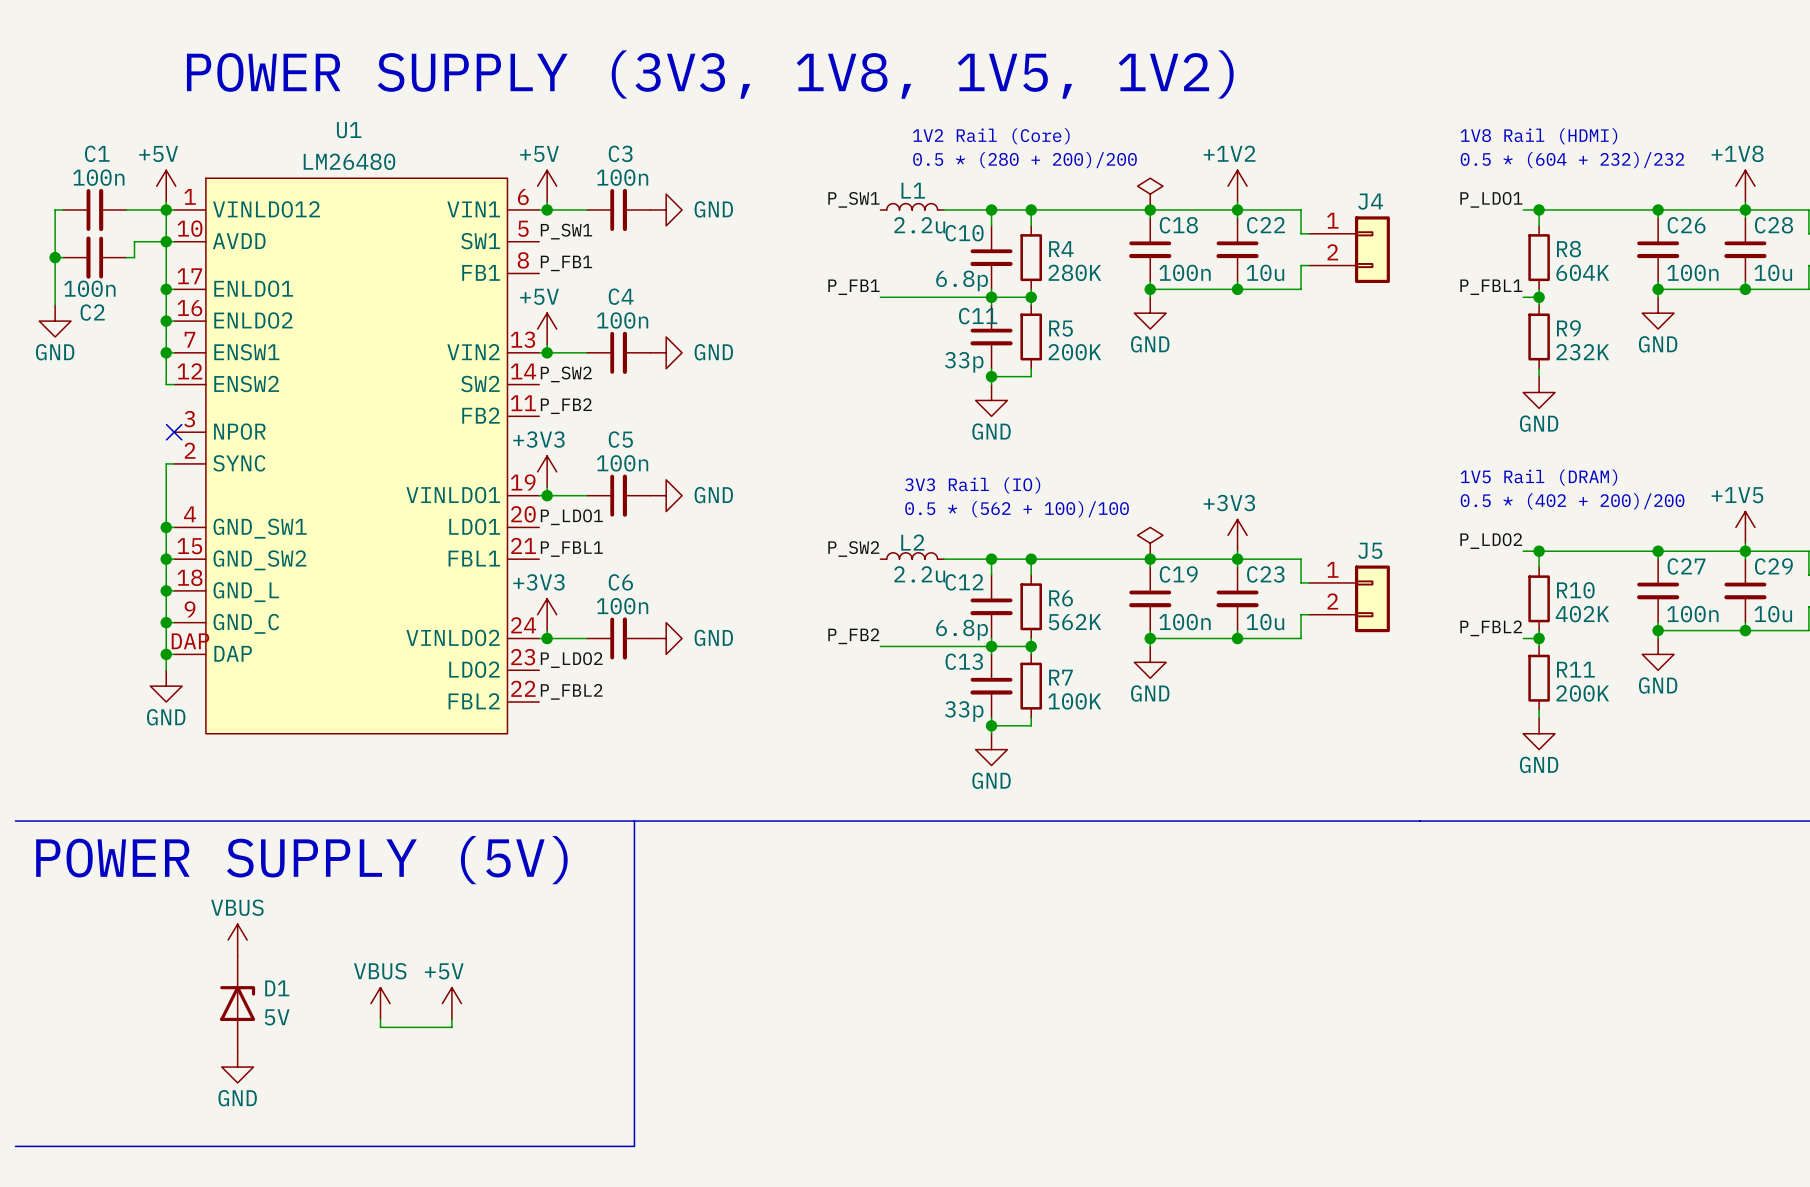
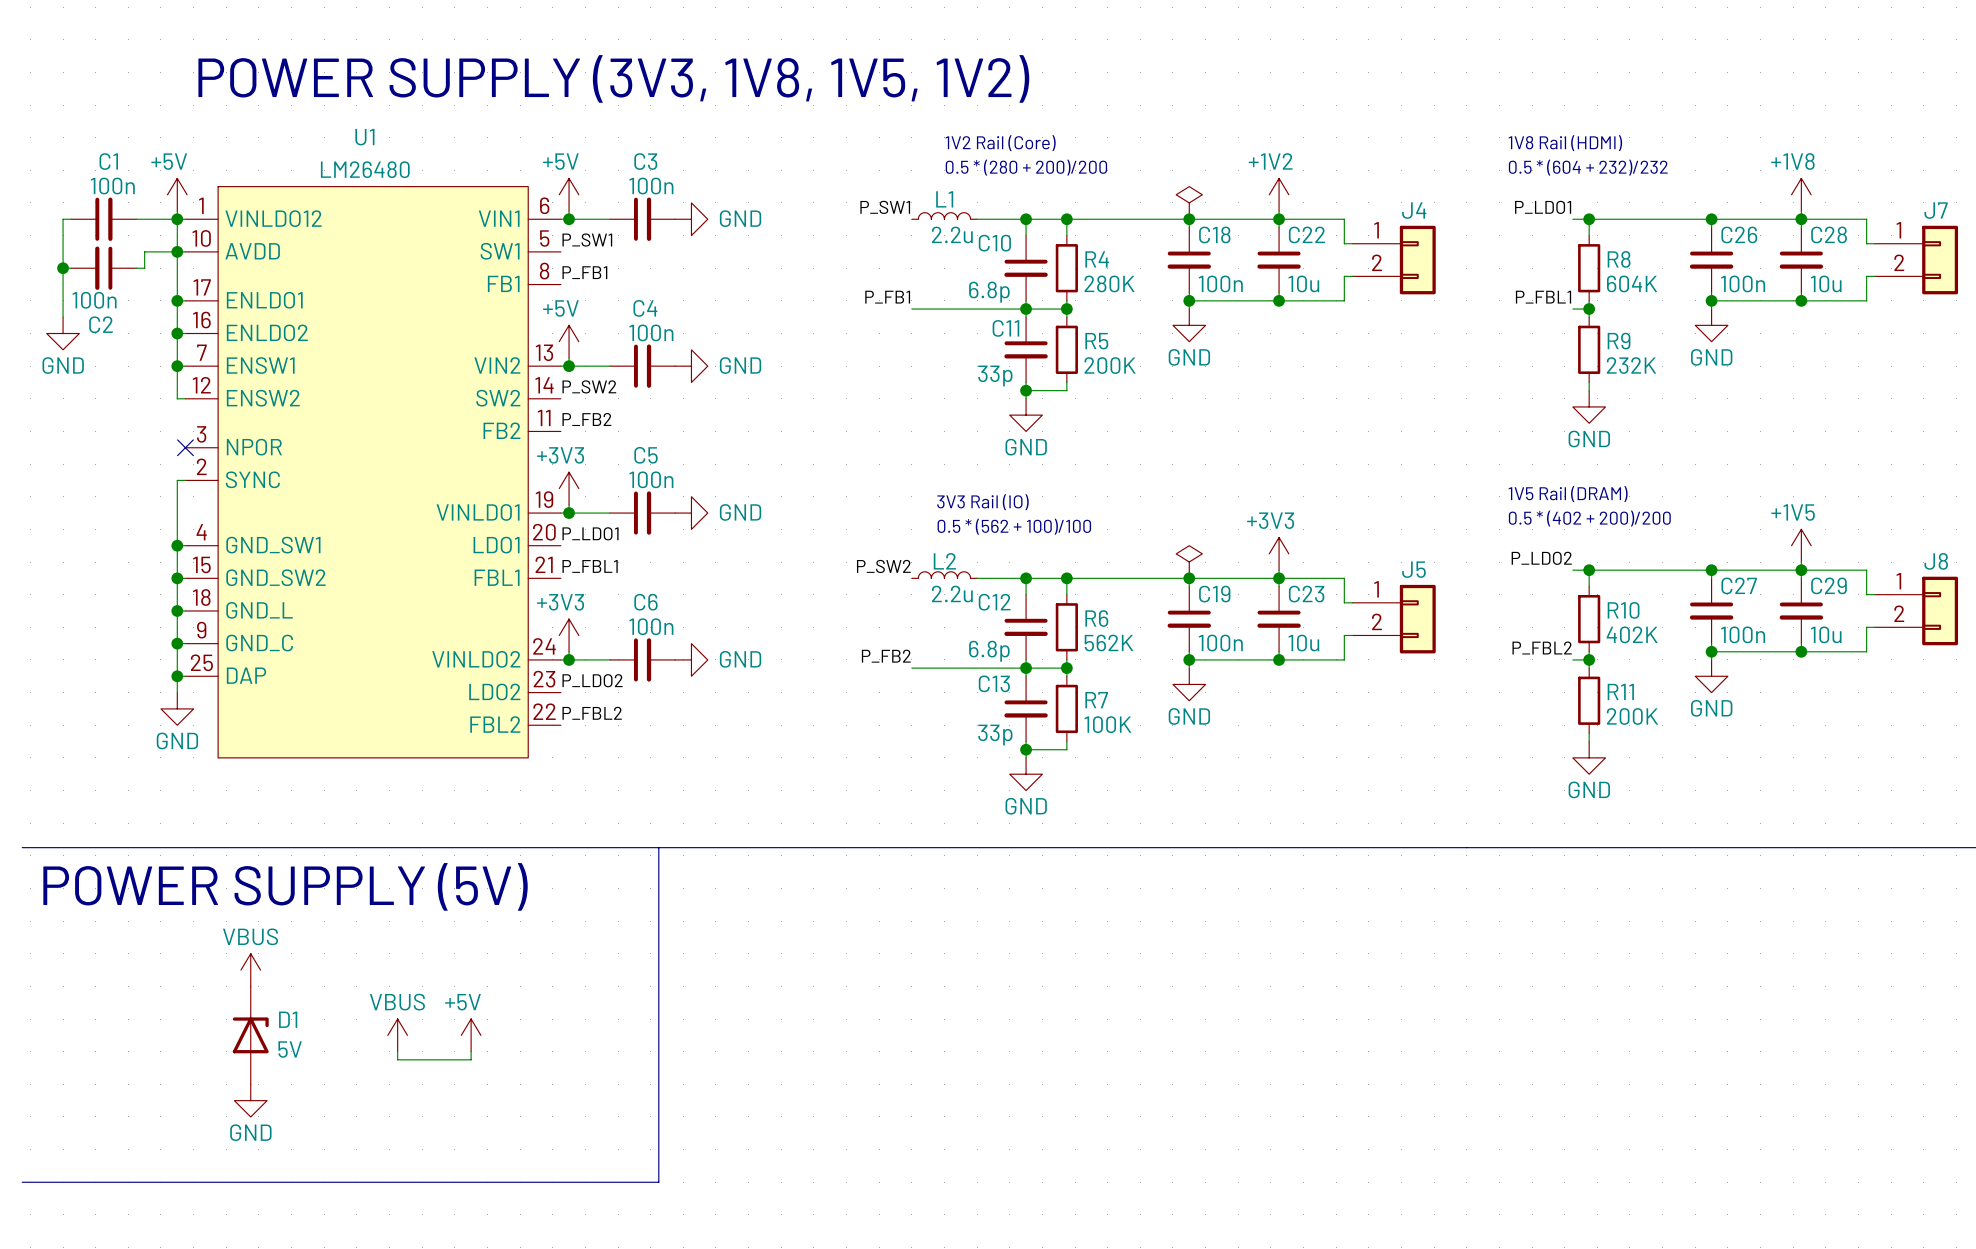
U1 pin number: DAP (190, 641) -> 25 (201, 662)

